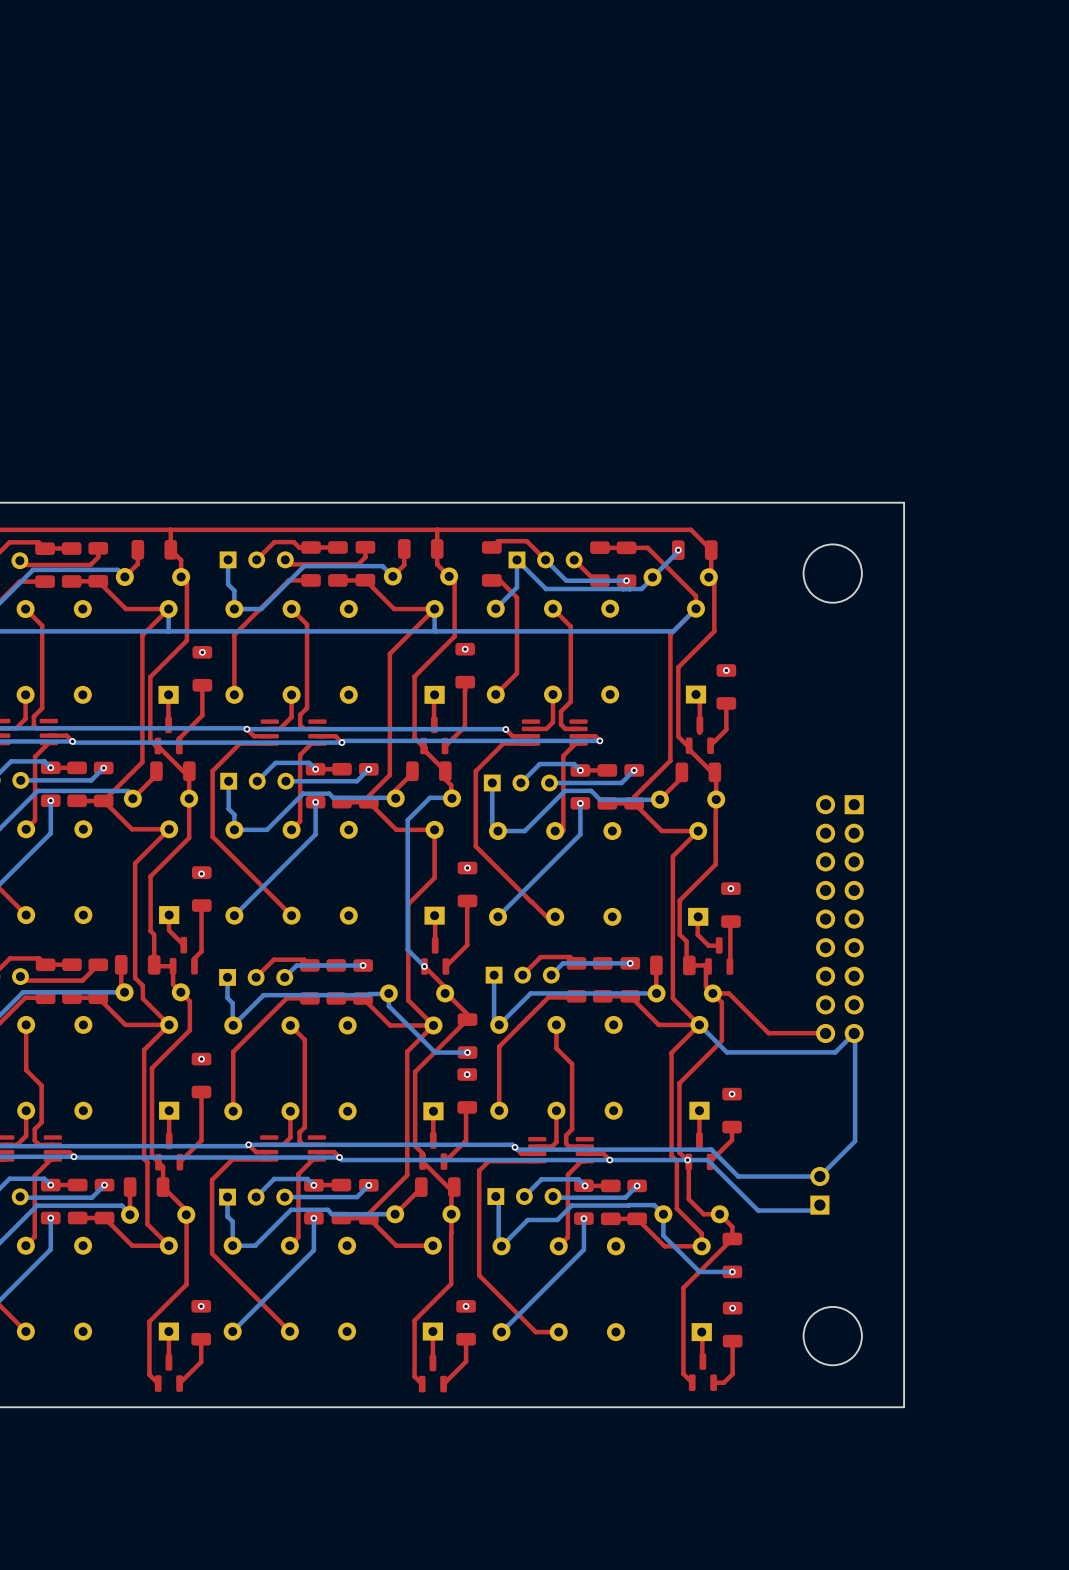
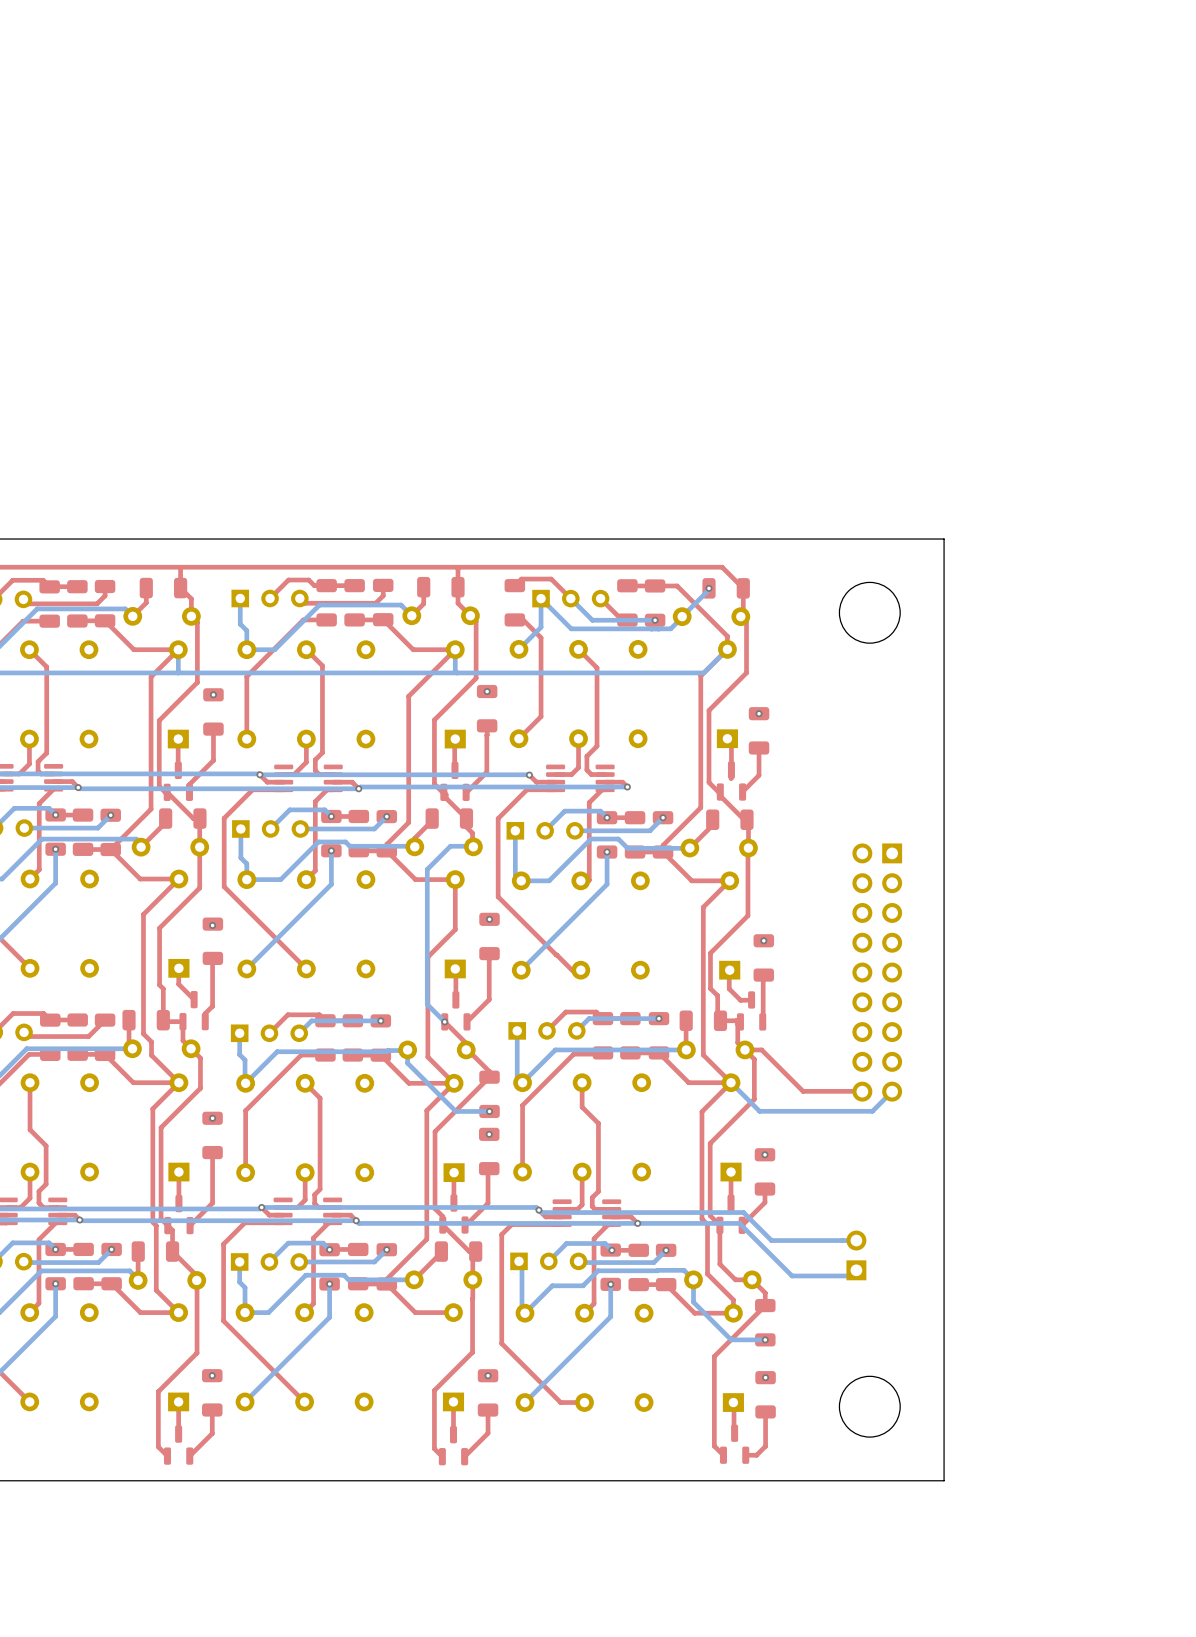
bottom track: (854, 1033) (855, 1141) (819, 1176) -> none
via: (687, 1160) -> none

